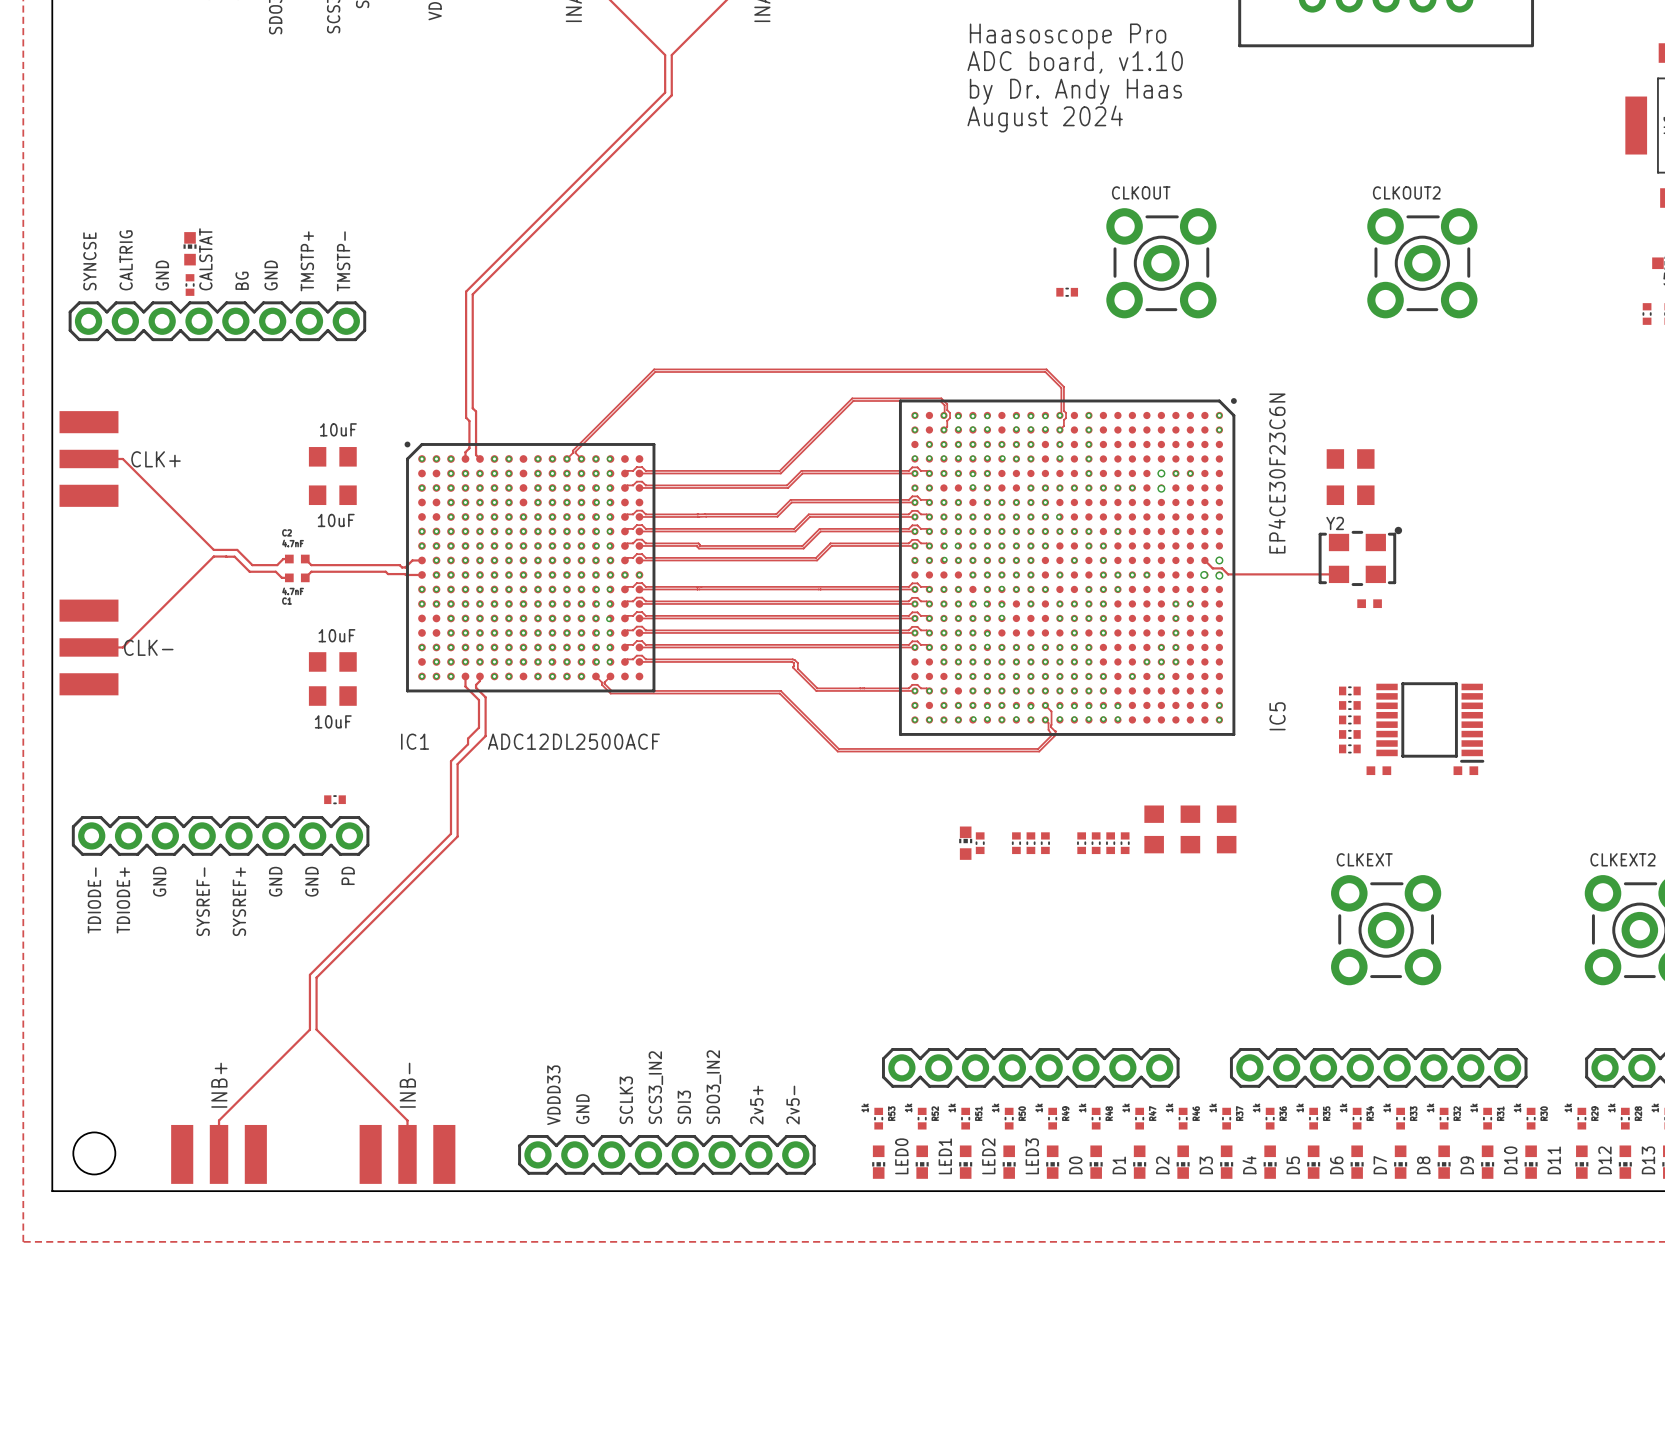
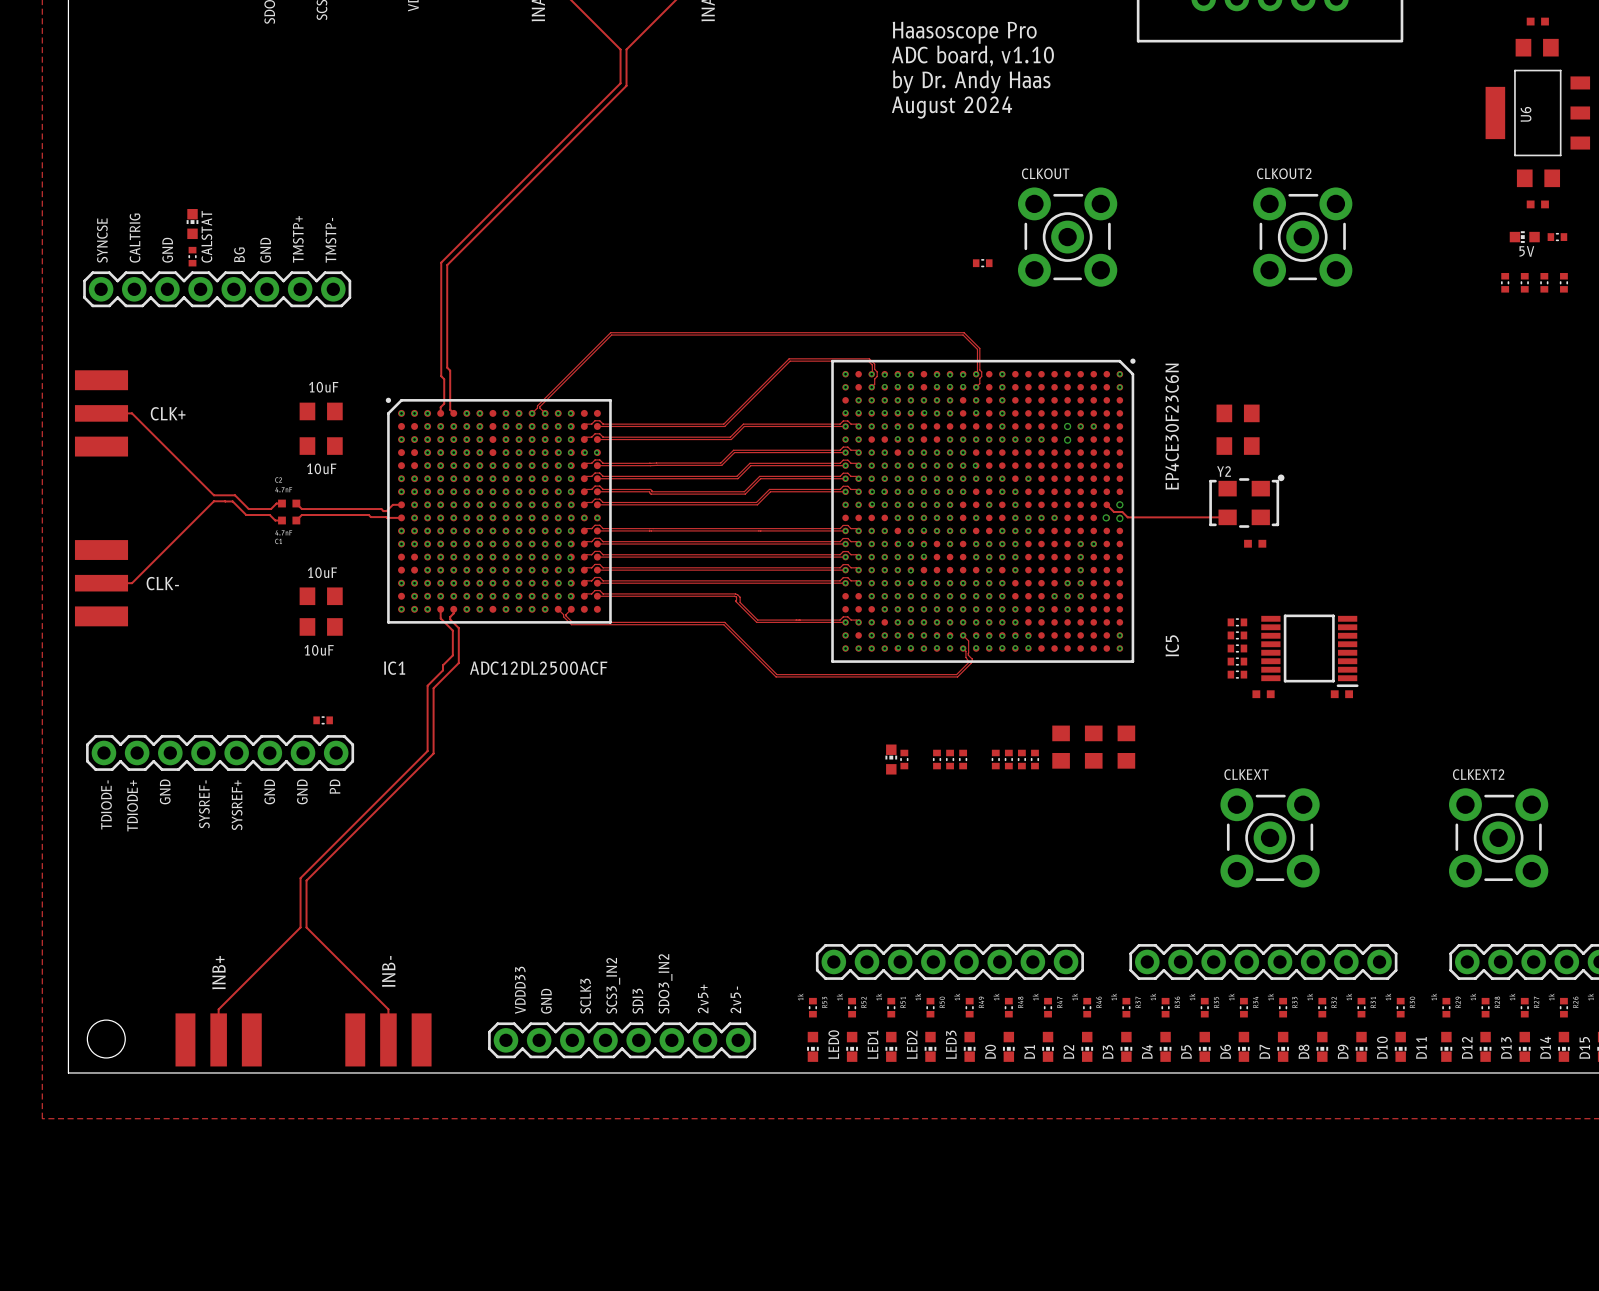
via: none -> (585, 452)
via: none -> (596, 452)

